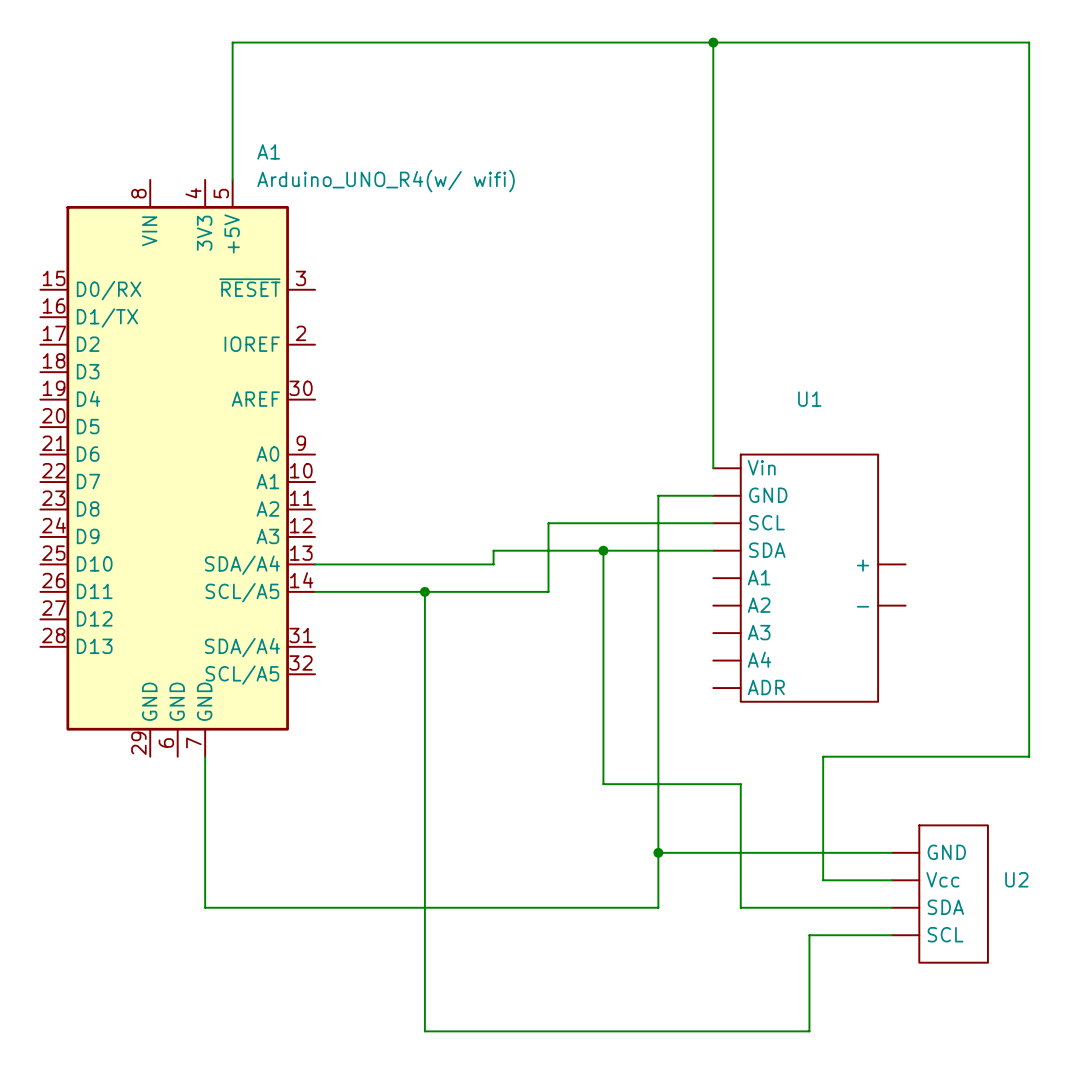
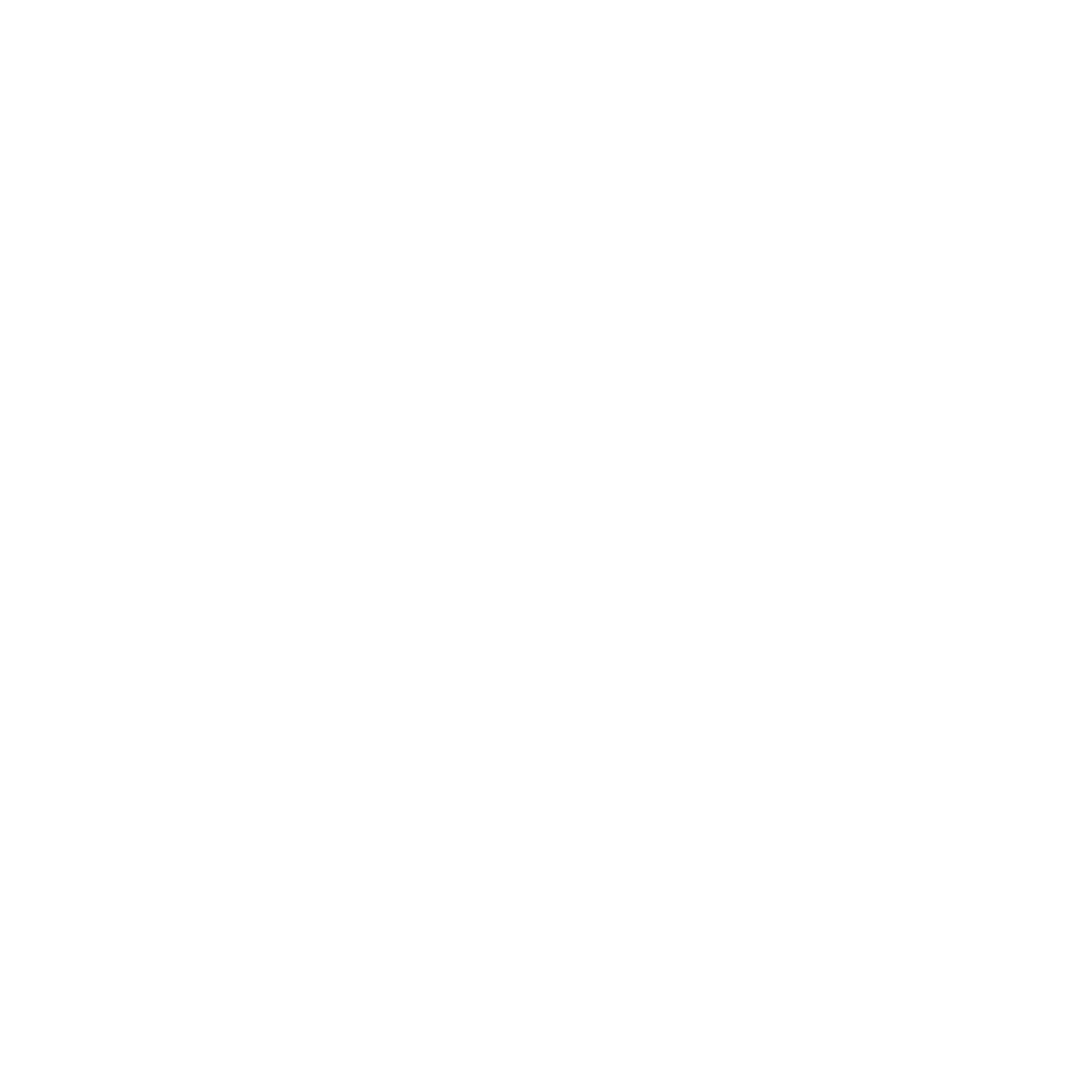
wire: (713, 42) (713, 468) -> none
junction: (713, 42) -> none
wire: (232, 179) (232, 42) (1029, 42) (1029, 756) (823, 756) (823, 880) (891, 880) -> none
A1: Arduino_UNO_R4(w/ wifi) (177, 468) -> none
wire: (713, 495) (658, 495) (658, 907) (205, 907) (205, 756) -> none
wire: (713, 523) (548, 523) (548, 591) (315, 591) -> none
wire: (603, 550) (603, 784) (740, 784) (740, 907) (891, 907) -> none
junction: (603, 550) -> none
wire: (713, 550) (493, 550) (493, 564) (315, 564) -> none
U1: (809, 578) -> none
wire: (424, 591) (424, 1031) (809, 1031) (809, 935) (891, 935) -> none
junction: (424, 591) -> none
wire: (658, 852) (891, 852) -> none
junction: (658, 852) -> none
U2: (939, 894) -> none

